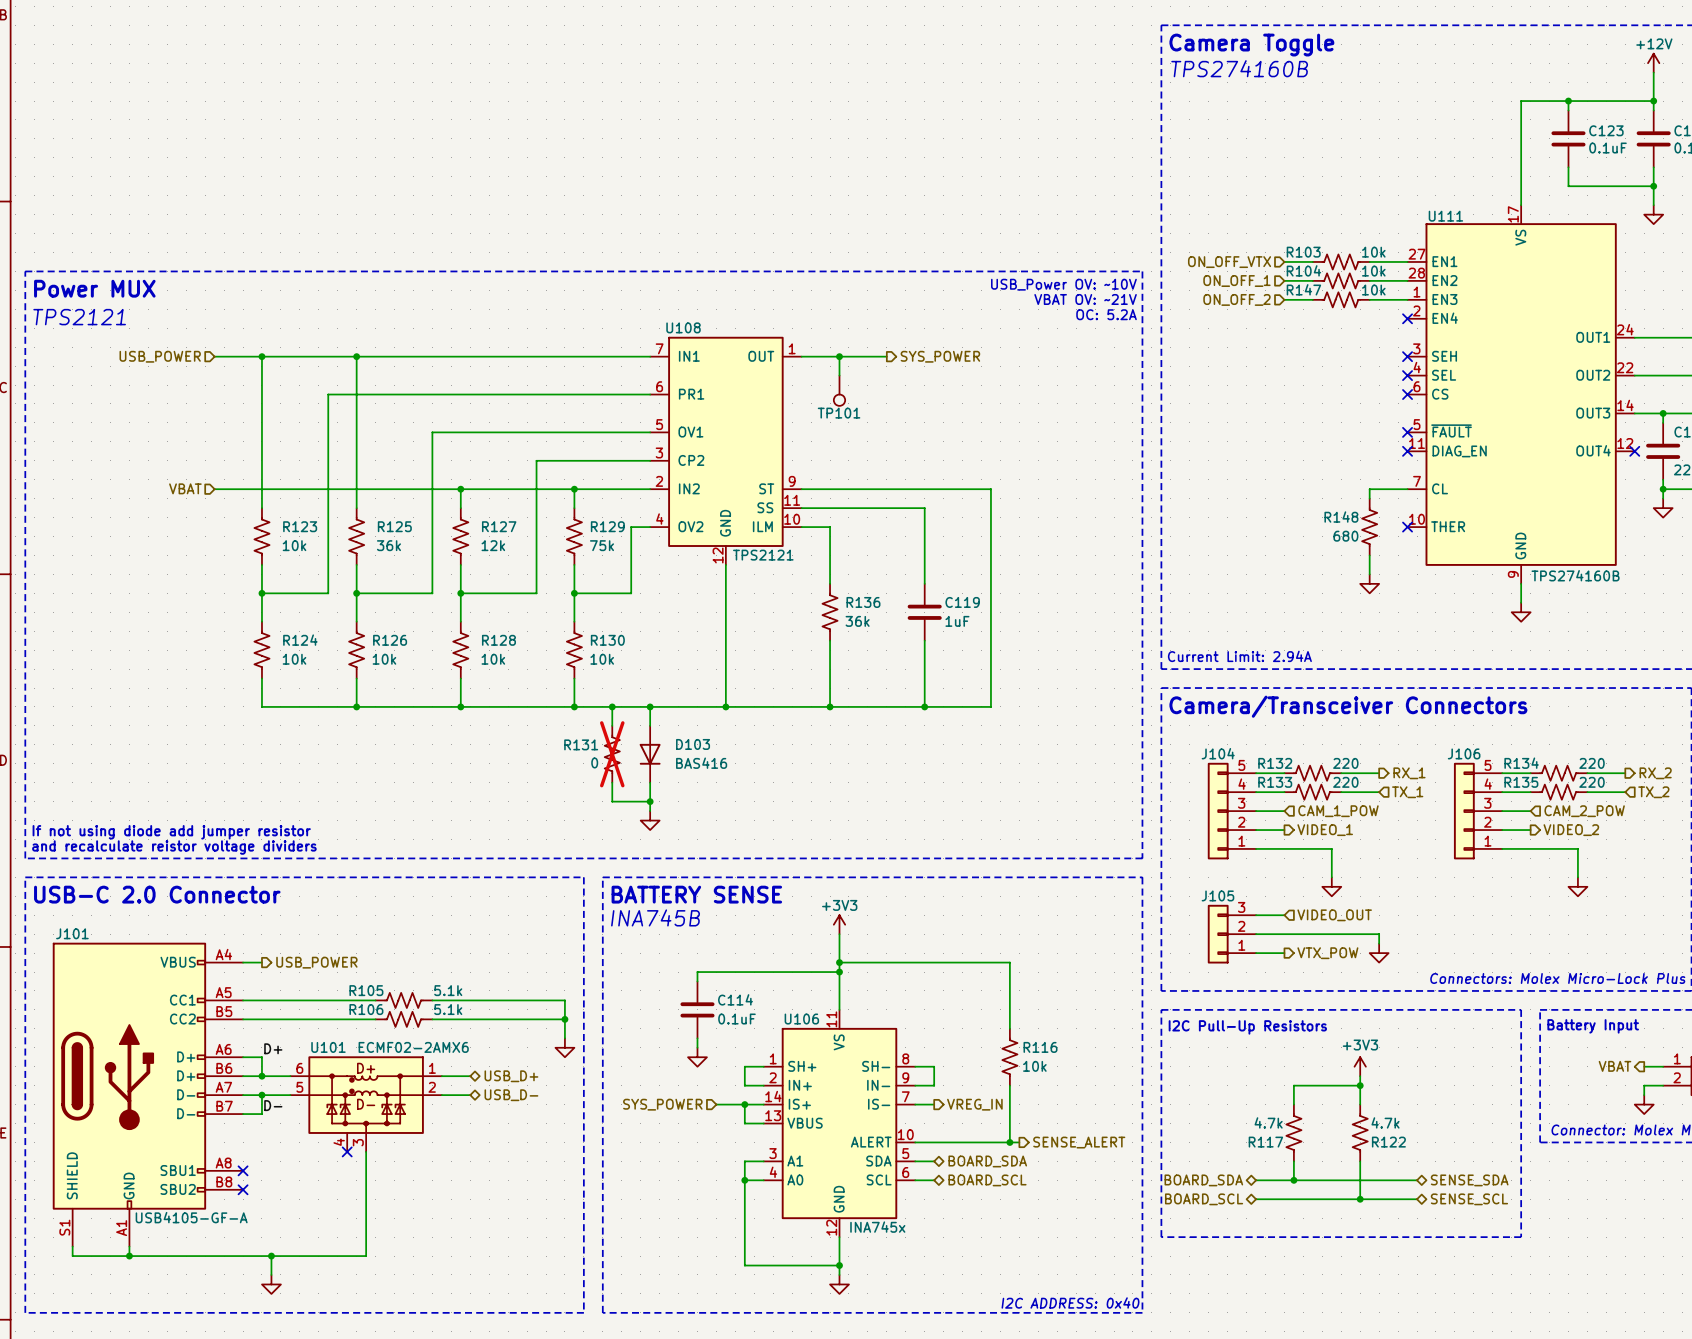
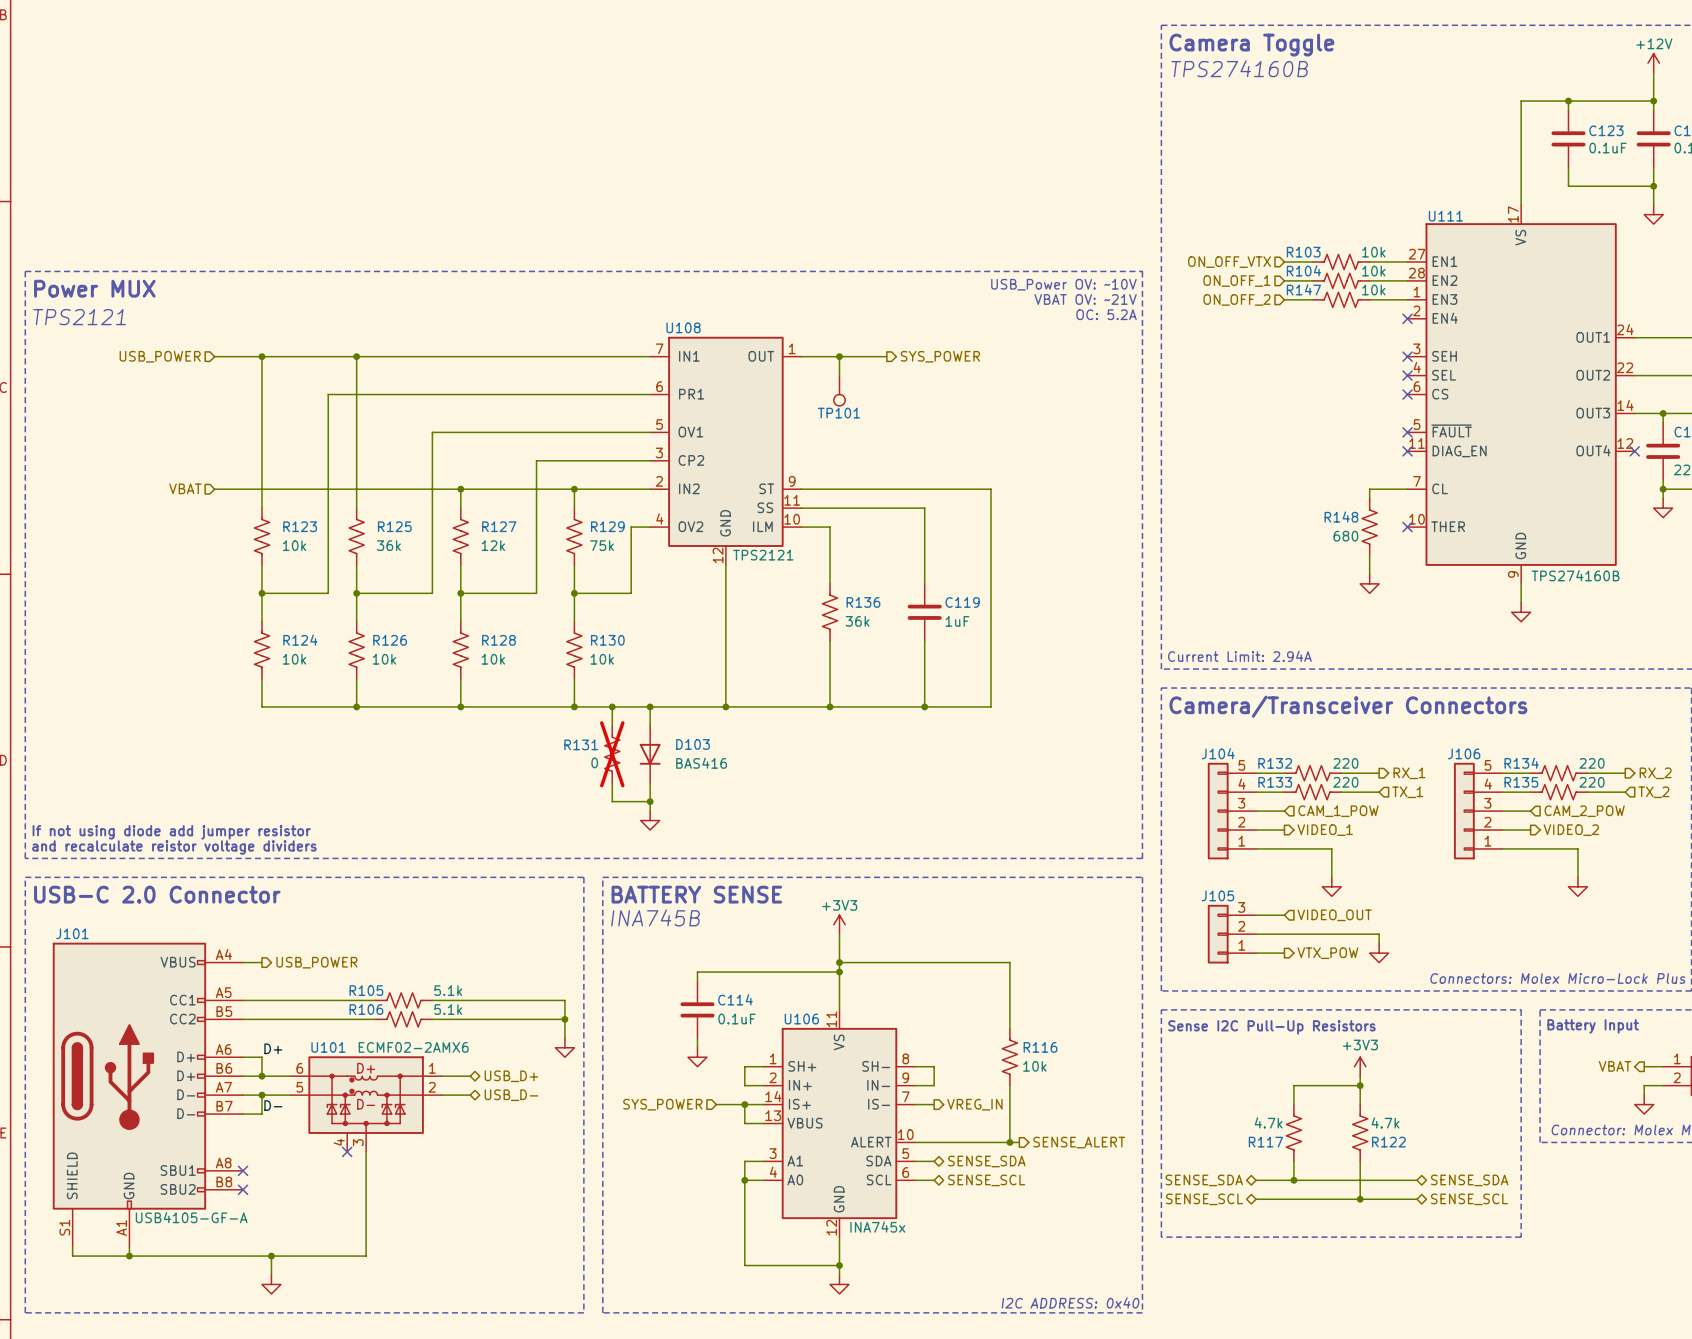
text: I2C Pull-Up Resistors (1247, 1027) -> Sense I2C Pull-Up Resistors (1271, 1027)
hierarchical label: BOARD_SDA (987, 1161) -> SENSE_SDA (986, 1161)
hierarchical label: BOARD_SCL (987, 1180) -> SENSE_SCL (986, 1180)
hierarchical label: BOARD_SDA (1203, 1180) -> SENSE_SDA (1204, 1180)
hierarchical label: BOARD_SCL (1204, 1199) -> SENSE_SCL (1204, 1199)

